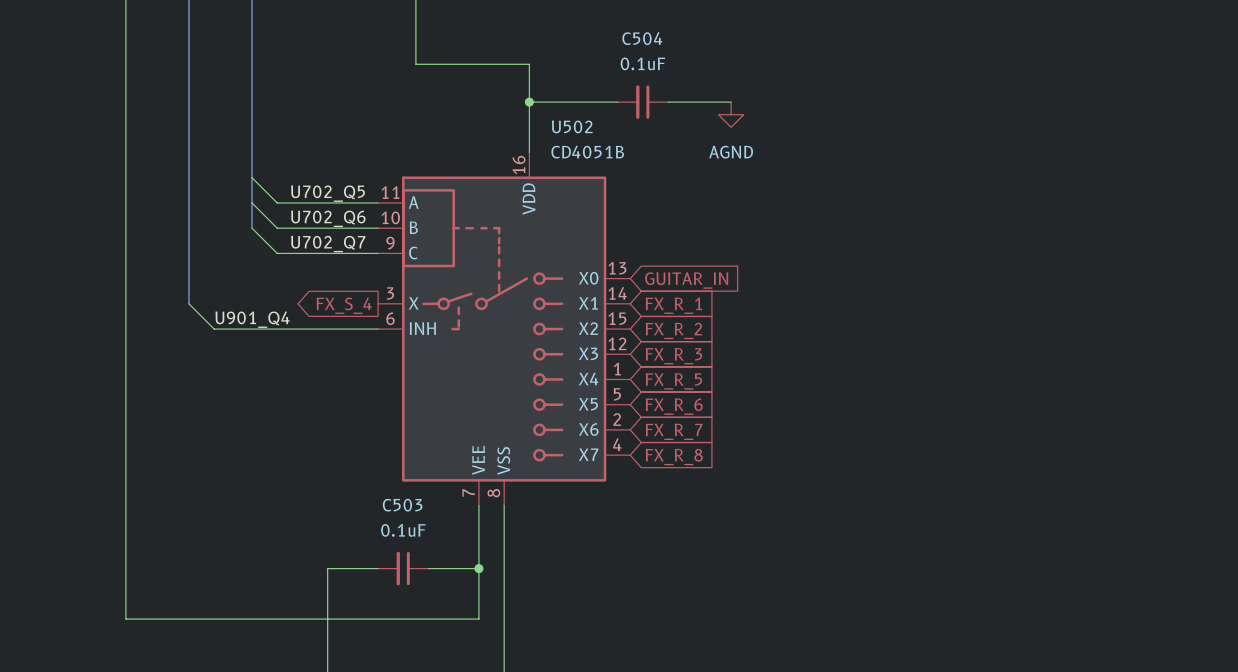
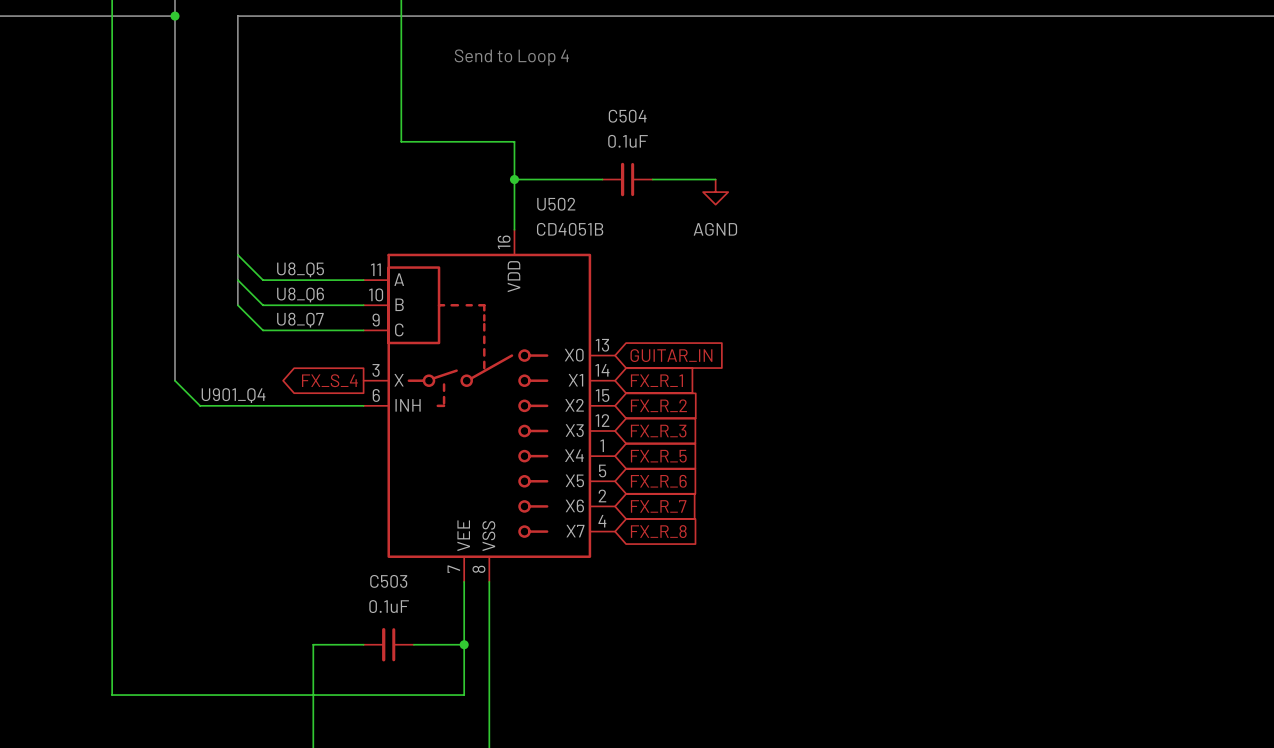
label: U702_Q5 (327, 193) -> U8_Q5 (300, 269)
label: U702_Q6 (328, 218) -> U8_Q6 (300, 294)
label: U702_Q7 (328, 244) -> U8_Q7 (300, 320)

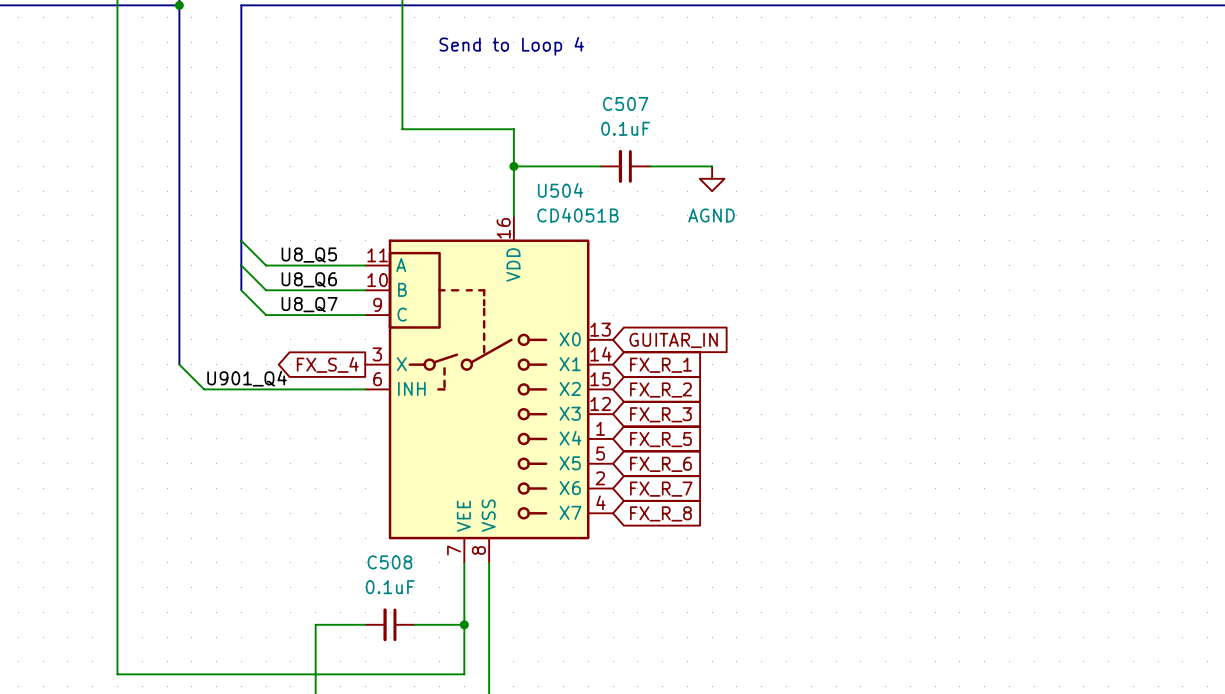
C504 name: C504 (627, 116) -> C507 (625, 104)
U502 name: U502 (556, 204) -> U504 (560, 190)
C503 name: C503 (388, 581) -> C508 (389, 562)

